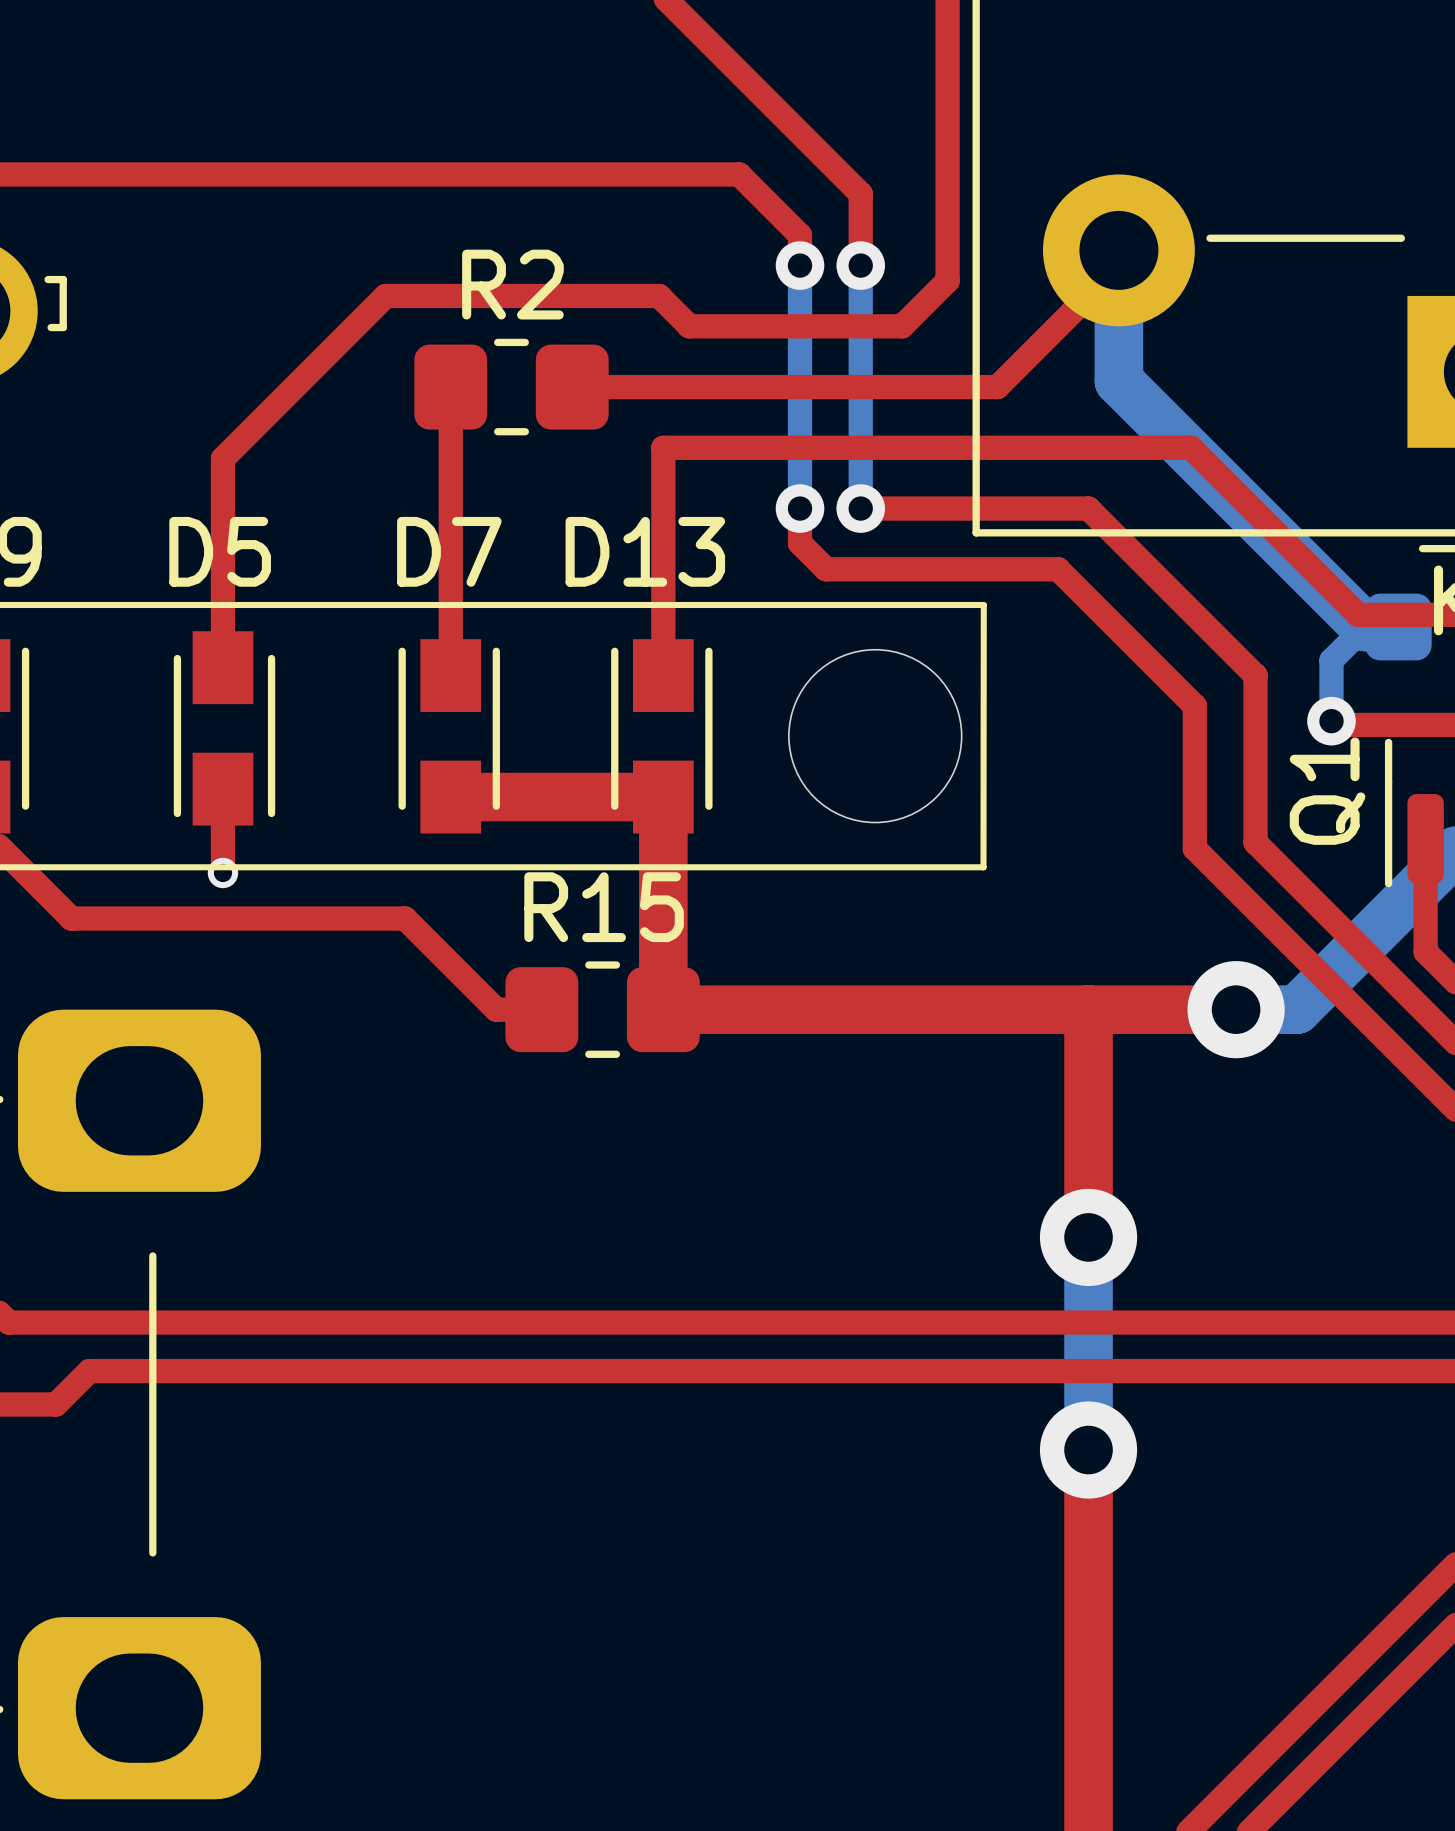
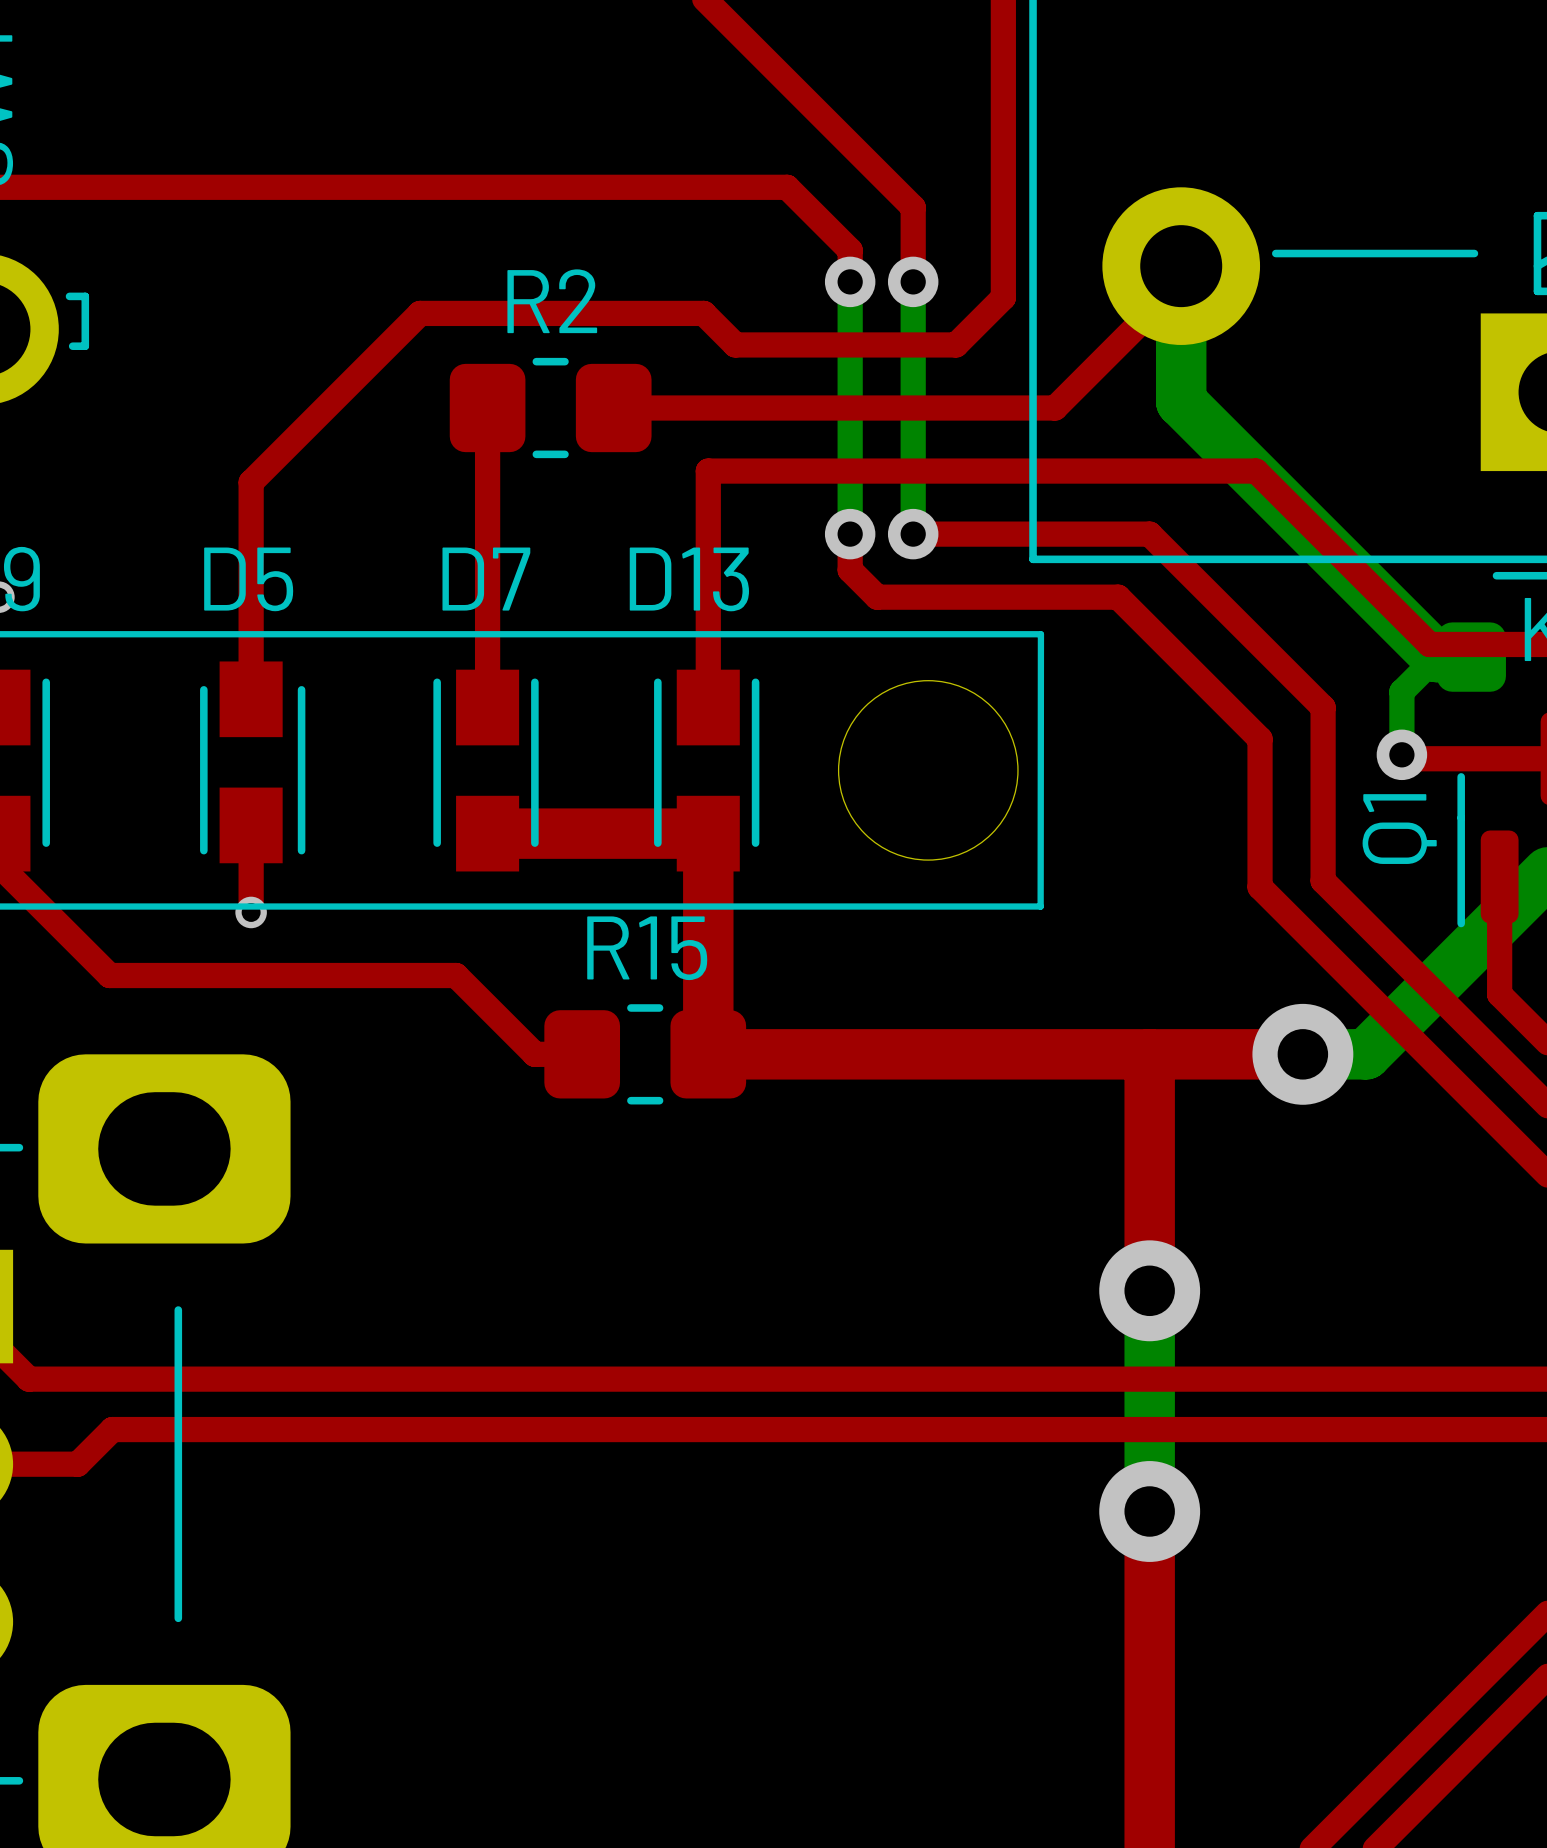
top track: (71, 918) (405, 918) (420, 933) -> (93, 959) (109, 975) (456, 975)

